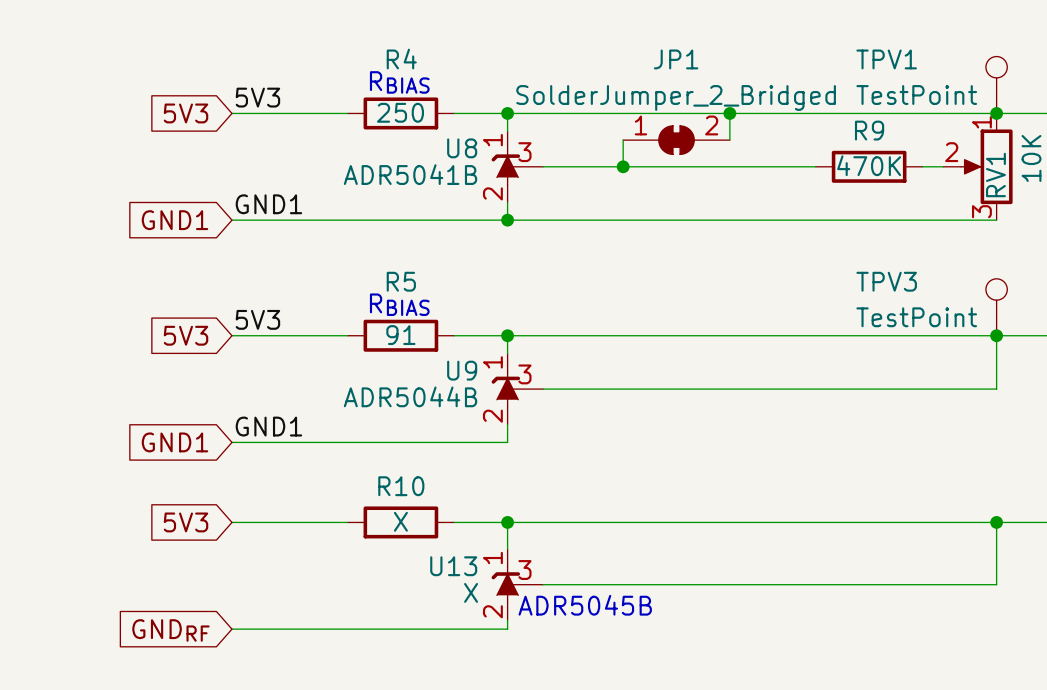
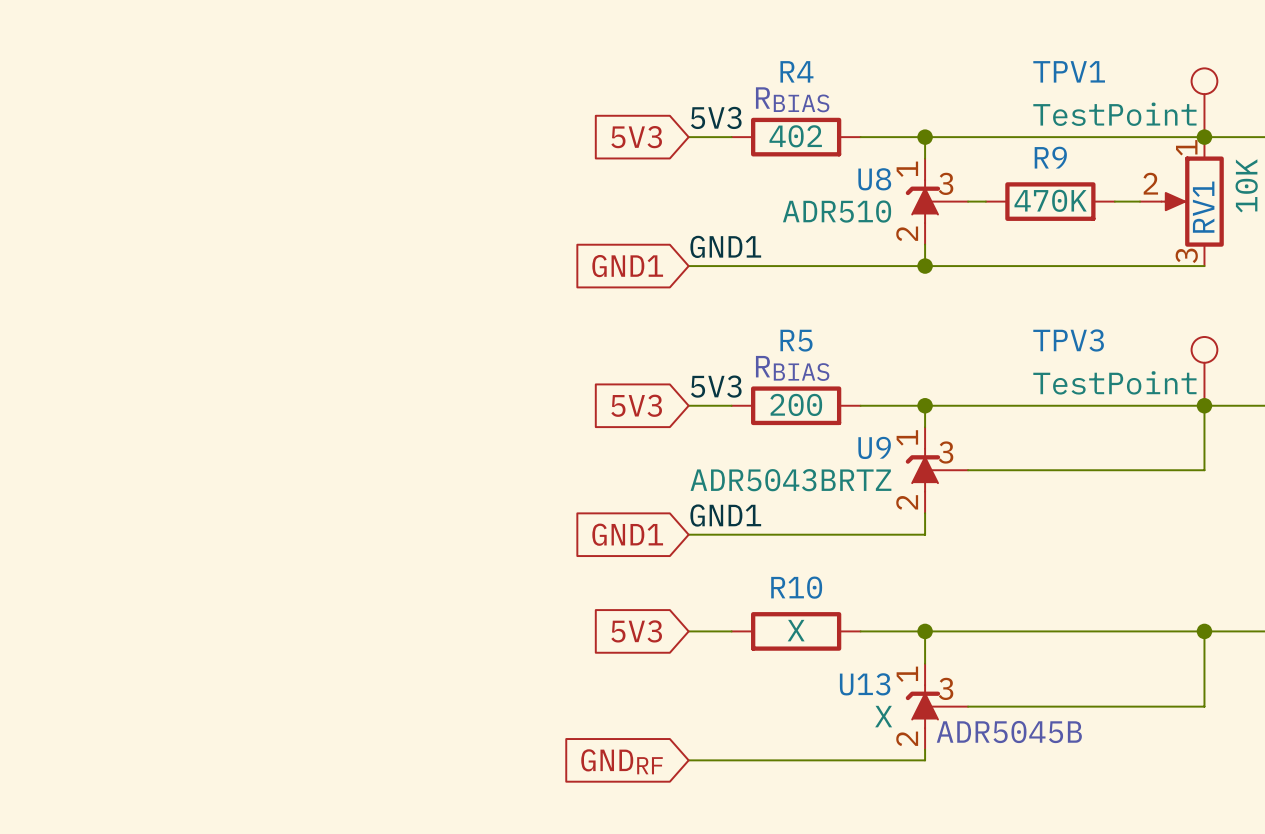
text: RBIAS (399, 82) -> none
text: none -> RBIAS (792, 99)
label: 5V3 (257, 97) -> none
label: none -> 5V3 (716, 117)
R4 value: 250 (400, 112) -> 402 (795, 136)
global label: 5V3 (186, 113) -> none
wire: (231, 113) (347, 113) -> none
R4 position: (400, 113) -> (796, 137)
wire: (454, 113) (569, 113) -> none
wire: (507, 113) (507, 131) -> (925, 137) (925, 158)
junction: (507, 113) -> none
global label: none -> 5V3 (636, 137)
wire: (605, 113) (712, 113) -> none
wire: (729, 113) (729, 140) -> none
junction position: (729, 113) -> (925, 137)
wire: (623, 140) (623, 166) -> none
JP1: SolderJumper_2_Bridged (676, 140) -> none
U8 position: (517, 166) -> (936, 201)
wire: (543, 166) (801, 166) -> none
junction: (623, 166) -> none
U8 value: ADR5041B (410, 174) -> ADR510 (837, 211)
wire: (507, 202) (507, 220) -> (925, 244) (925, 266)
label: GND1 (268, 204) -> none
label: none -> GND1 (725, 246)
global label: GND1 (175, 220) -> none
wire: (231, 220) (569, 220) -> none
junction: (507, 220) -> none
global label: none -> GND1 (627, 266)
junction: none -> (925, 266)
text: RBIAS (399, 304) -> none
text: none -> RBIAS (792, 368)
label: 5V3 (257, 319) -> none
label: none -> 5V3 (716, 386)
global label: 5V3 (186, 335) -> none
wire: (231, 335) (347, 335) -> none
R5 position: (400, 335) -> (796, 405)
R5 value: 91 (400, 335) -> 200 (796, 404)
wire: (454, 335) (569, 335) -> none
wire: (507, 335) (507, 353) -> (925, 405) (925, 427)
junction: (507, 335) -> none
global label: none -> 5V3 (636, 405)
wire: (605, 335) (712, 335) -> none
junction: none -> (925, 405)
U9 position: (517, 389) -> (936, 470)
wire: (543, 389) (801, 389) -> none
U9 value: ADR5044B (410, 396) -> ADR5043BRTZ (790, 480)
wire: (507, 424) (507, 442) (231, 442) -> none
wire: none -> (925, 513) (925, 534) (688, 534)
label: GND1 (268, 426) -> none
label: none -> GND1 (725, 515)
global label: GND1 (175, 442) -> none
global label: none -> GND1 (627, 534)
global label: 5V3 (186, 522) -> none
wire: (231, 522) (347, 522) -> none
R10 position: (400, 522) -> (796, 631)
wire: (454, 522) (569, 522) -> none
wire: (507, 522) (507, 549) -> (925, 631) (925, 663)
junction: (507, 522) -> none
global label: none -> 5V3 (636, 631)
wire: (605, 522) (712, 522) -> none
junction: none -> (925, 631)
U13 position: (517, 584) -> (936, 706)
wire: (543, 584) (801, 584) -> none
text position: ADR5045B (585, 605) -> ADR5045B (1009, 732)
wire: (507, 620) (507, 629) (231, 629) -> none
wire: none -> (925, 749) (925, 760) (688, 760)
global label position: GNDRF (170, 630) -> GNDRF (622, 761)

